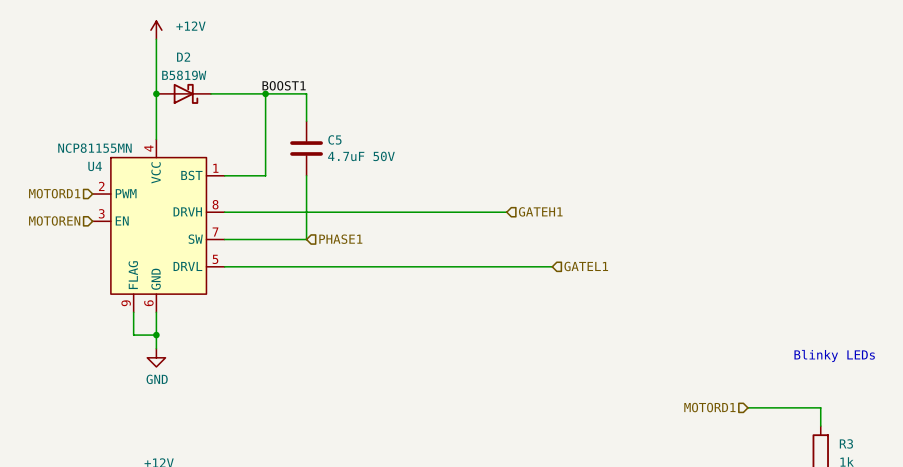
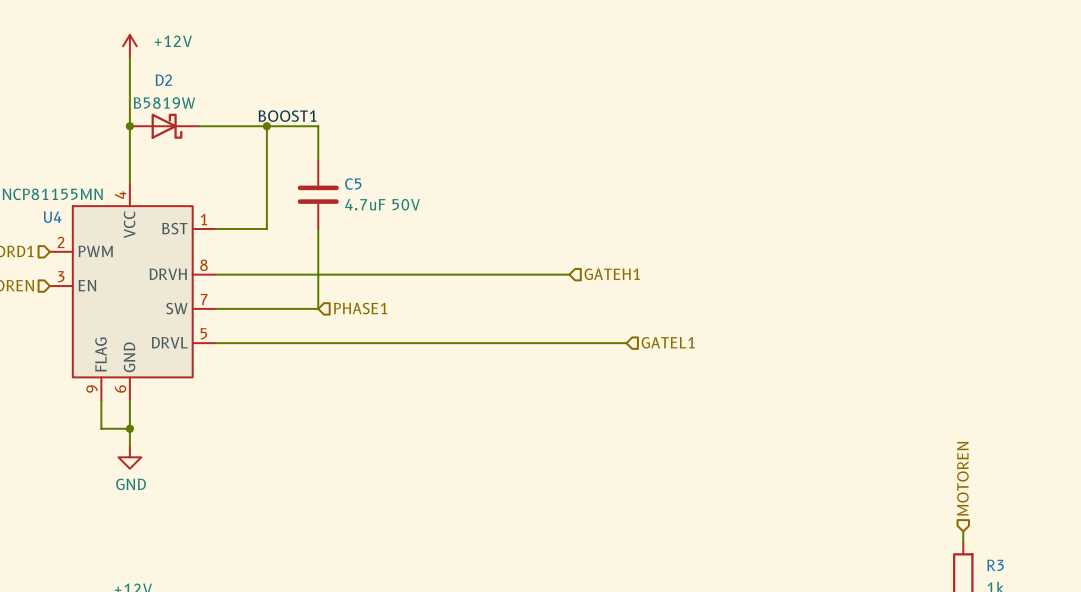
text: Blinky LEDs (834, 355) -> none
hierarchical label: none -> MOTOREN (962, 478)
hierarchical label: MOTORD1 (709, 407) -> none
wire: (747, 407) (820, 407) (820, 416) -> none

